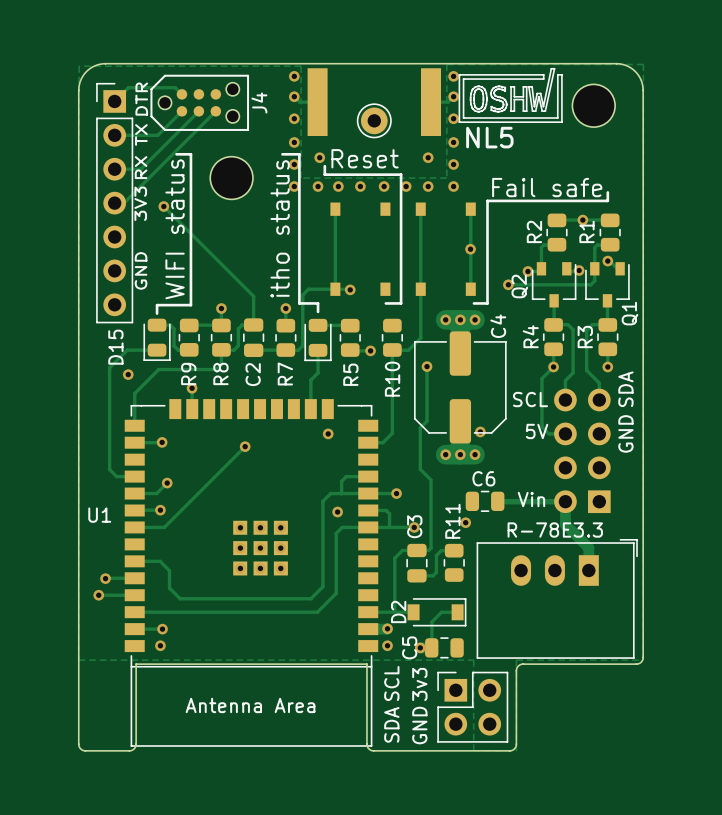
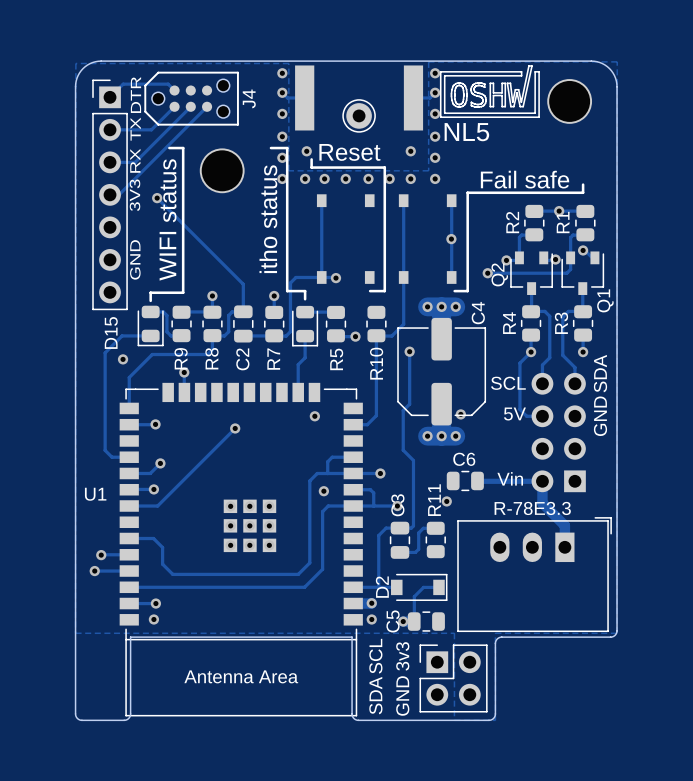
part footprint: [572, 84, 616, 128] -> [547, 79, 593, 124]
part footprint: [210, 156, 253, 200] -> [199, 148, 245, 194]

